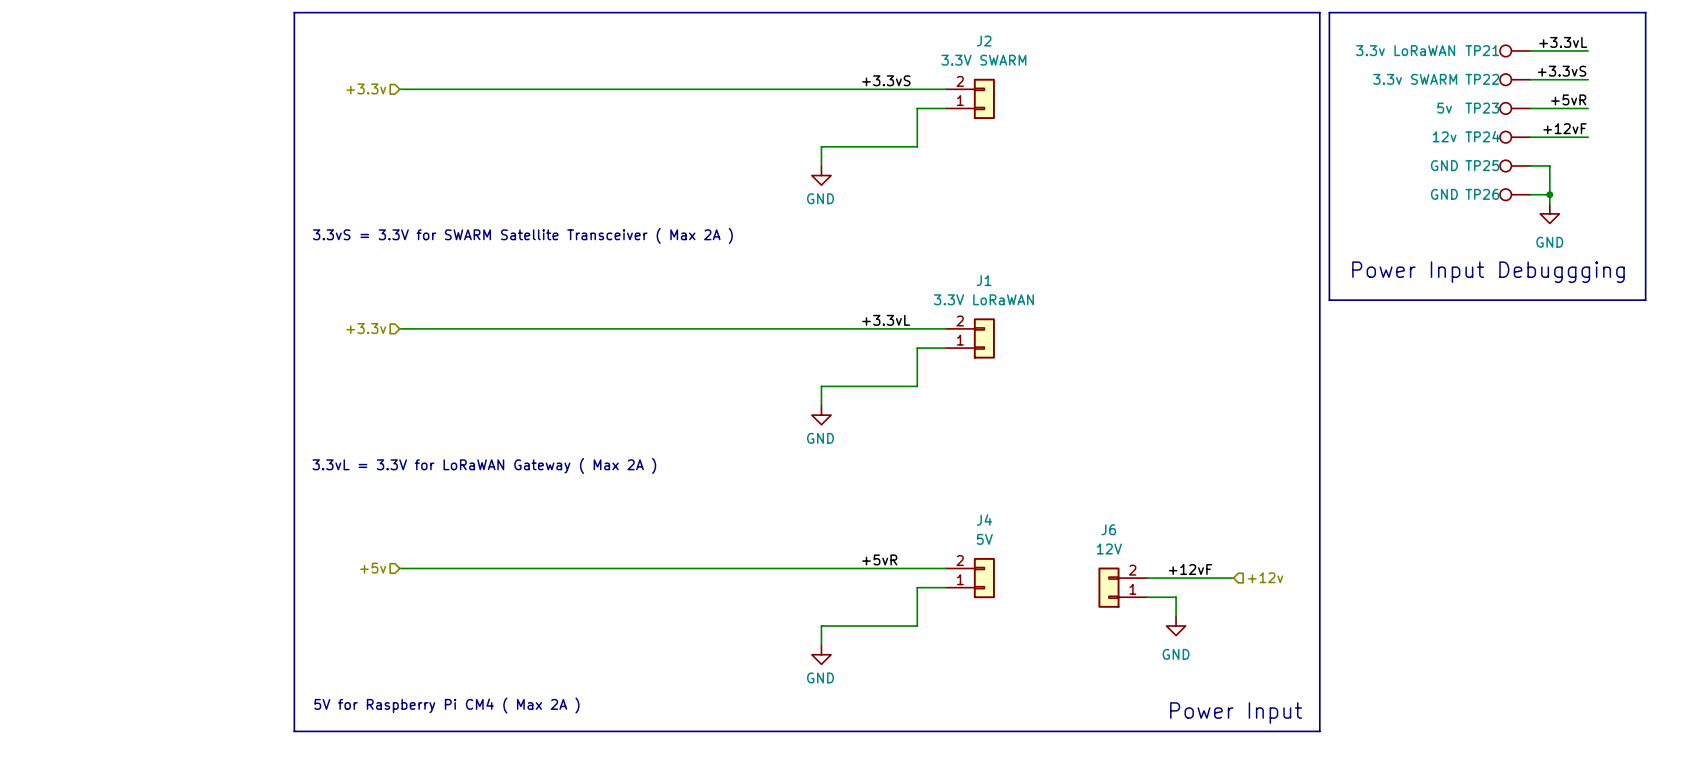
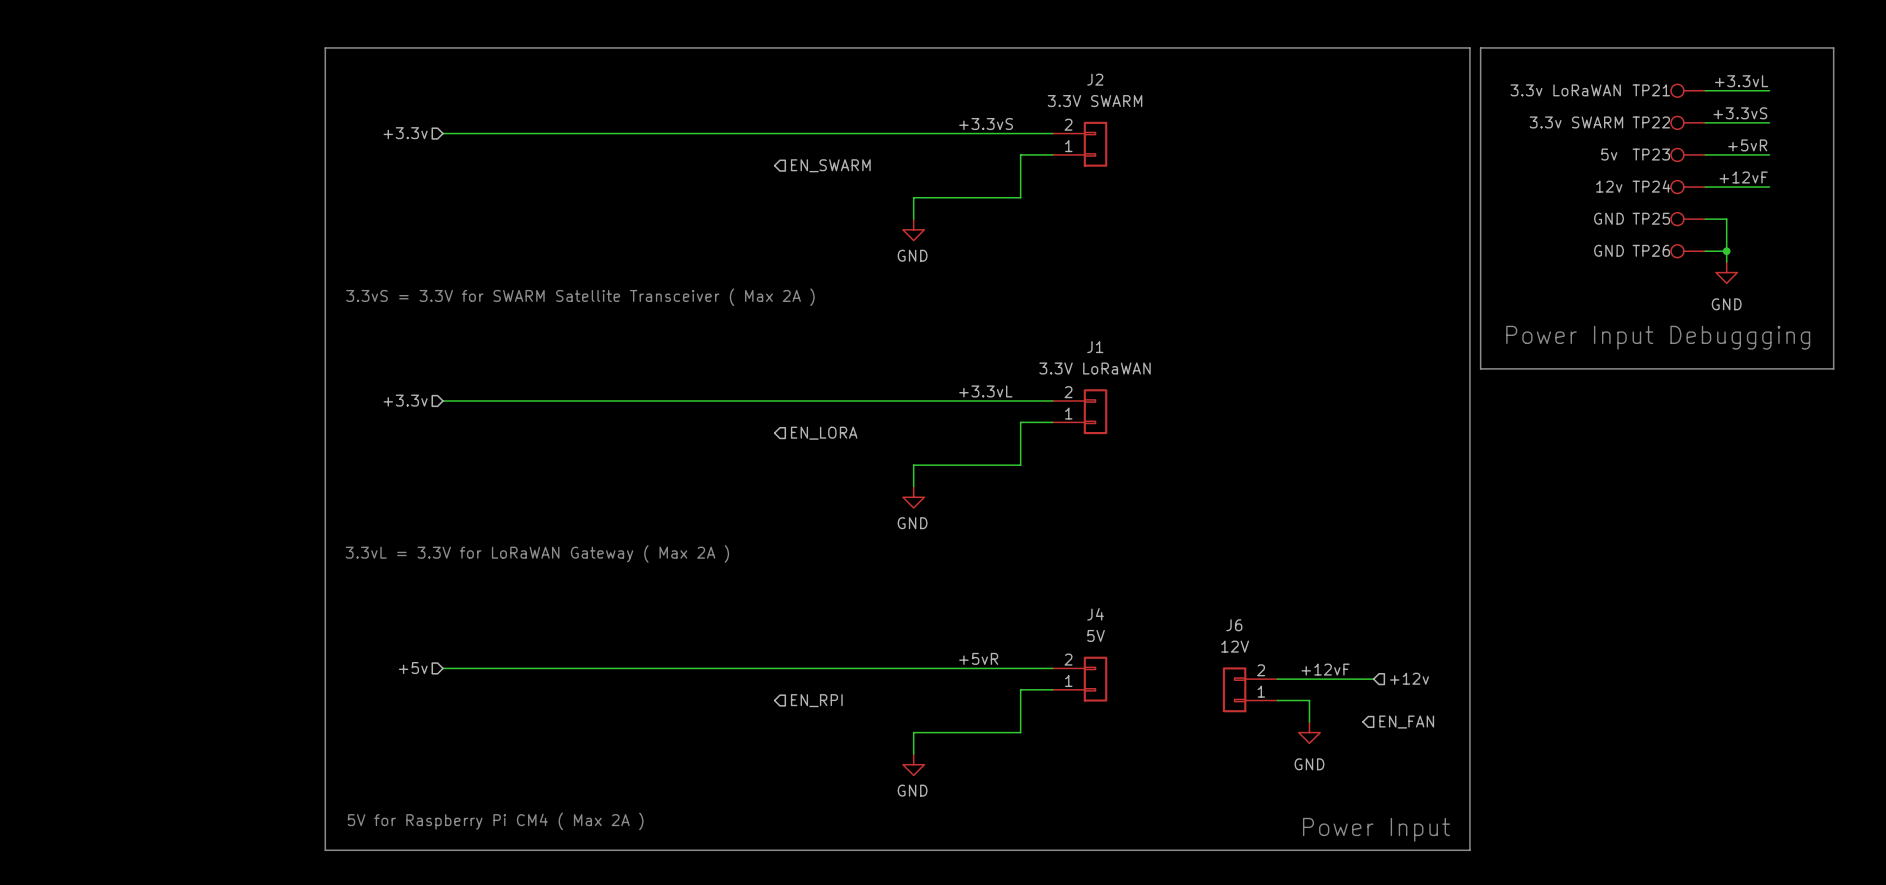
hierarchical label: none -> EN_SWARM (830, 165)
hierarchical label: none -> EN_LORA (824, 433)
hierarchical label: none -> EN_RPI (816, 700)
hierarchical label: none -> EN_FAN (1406, 722)

